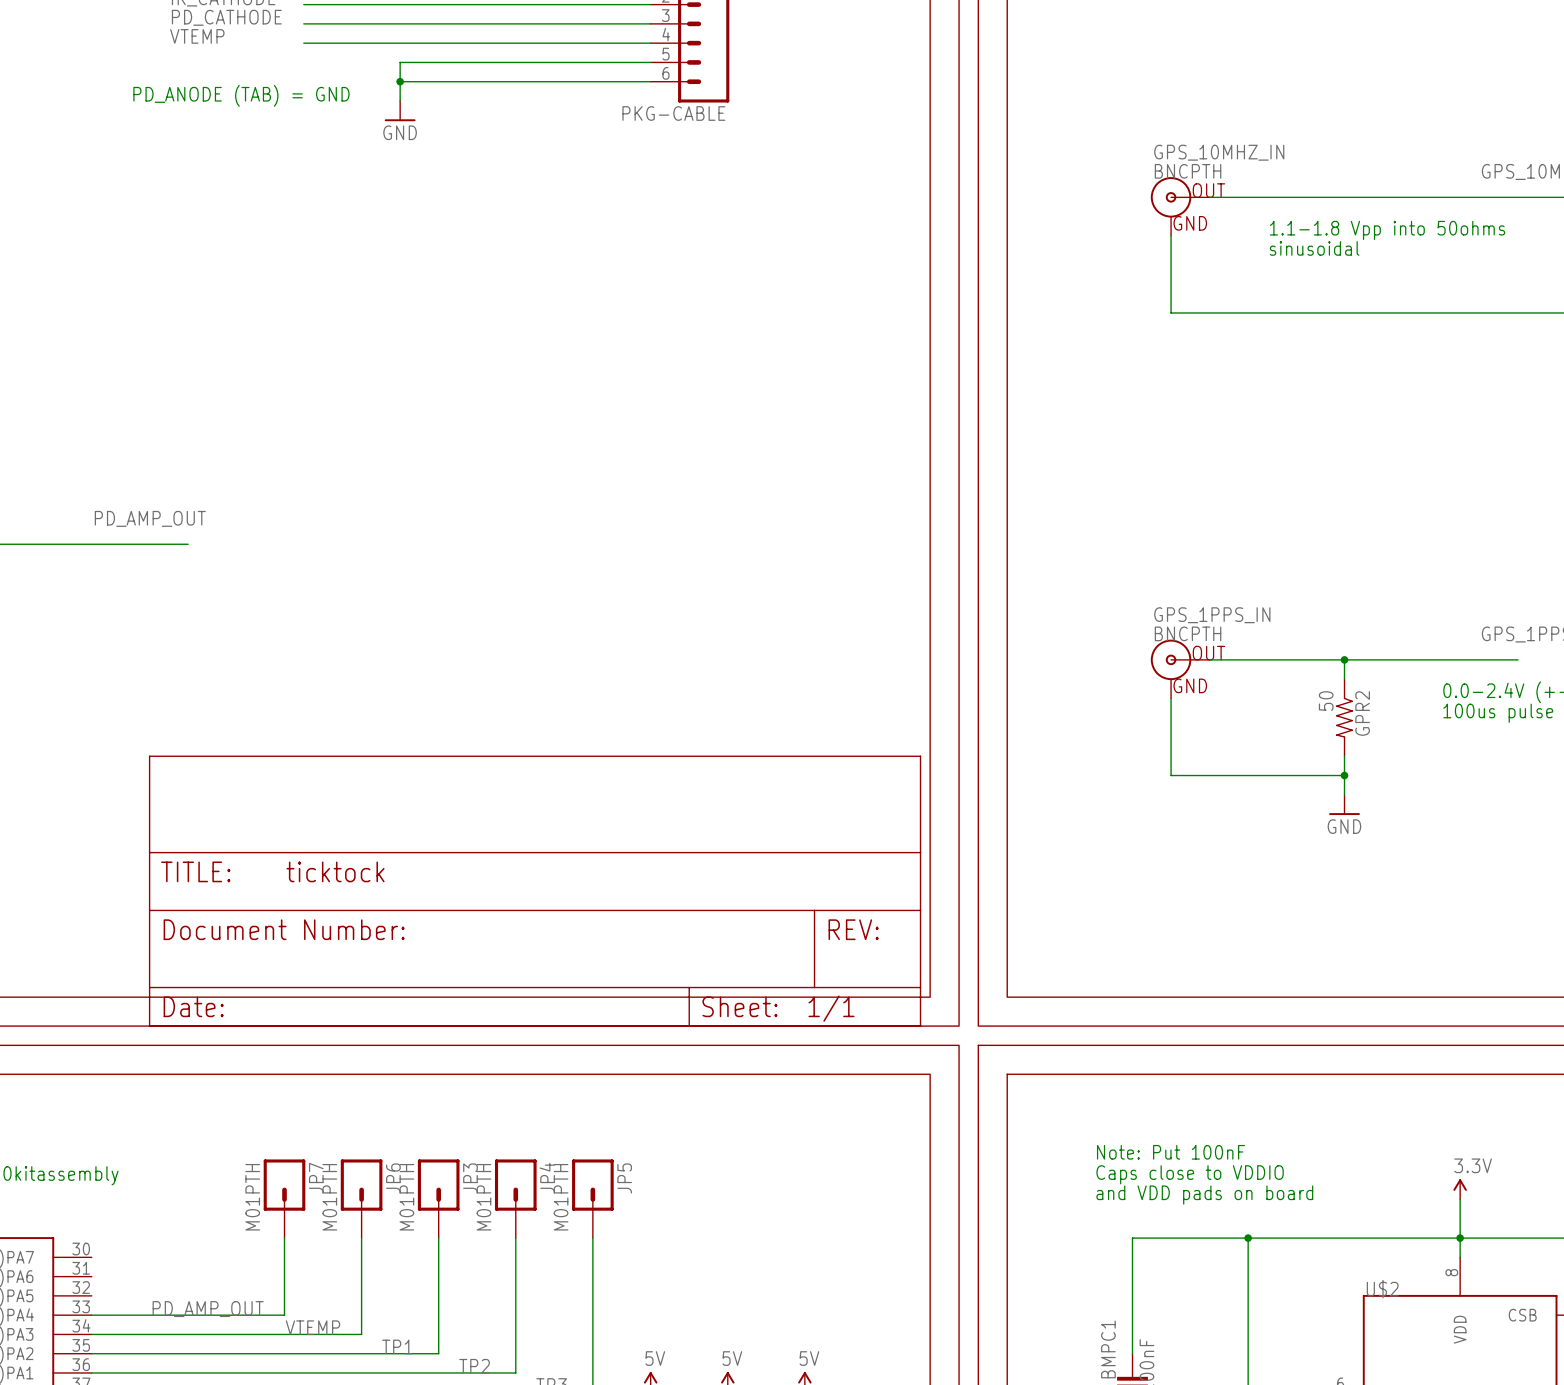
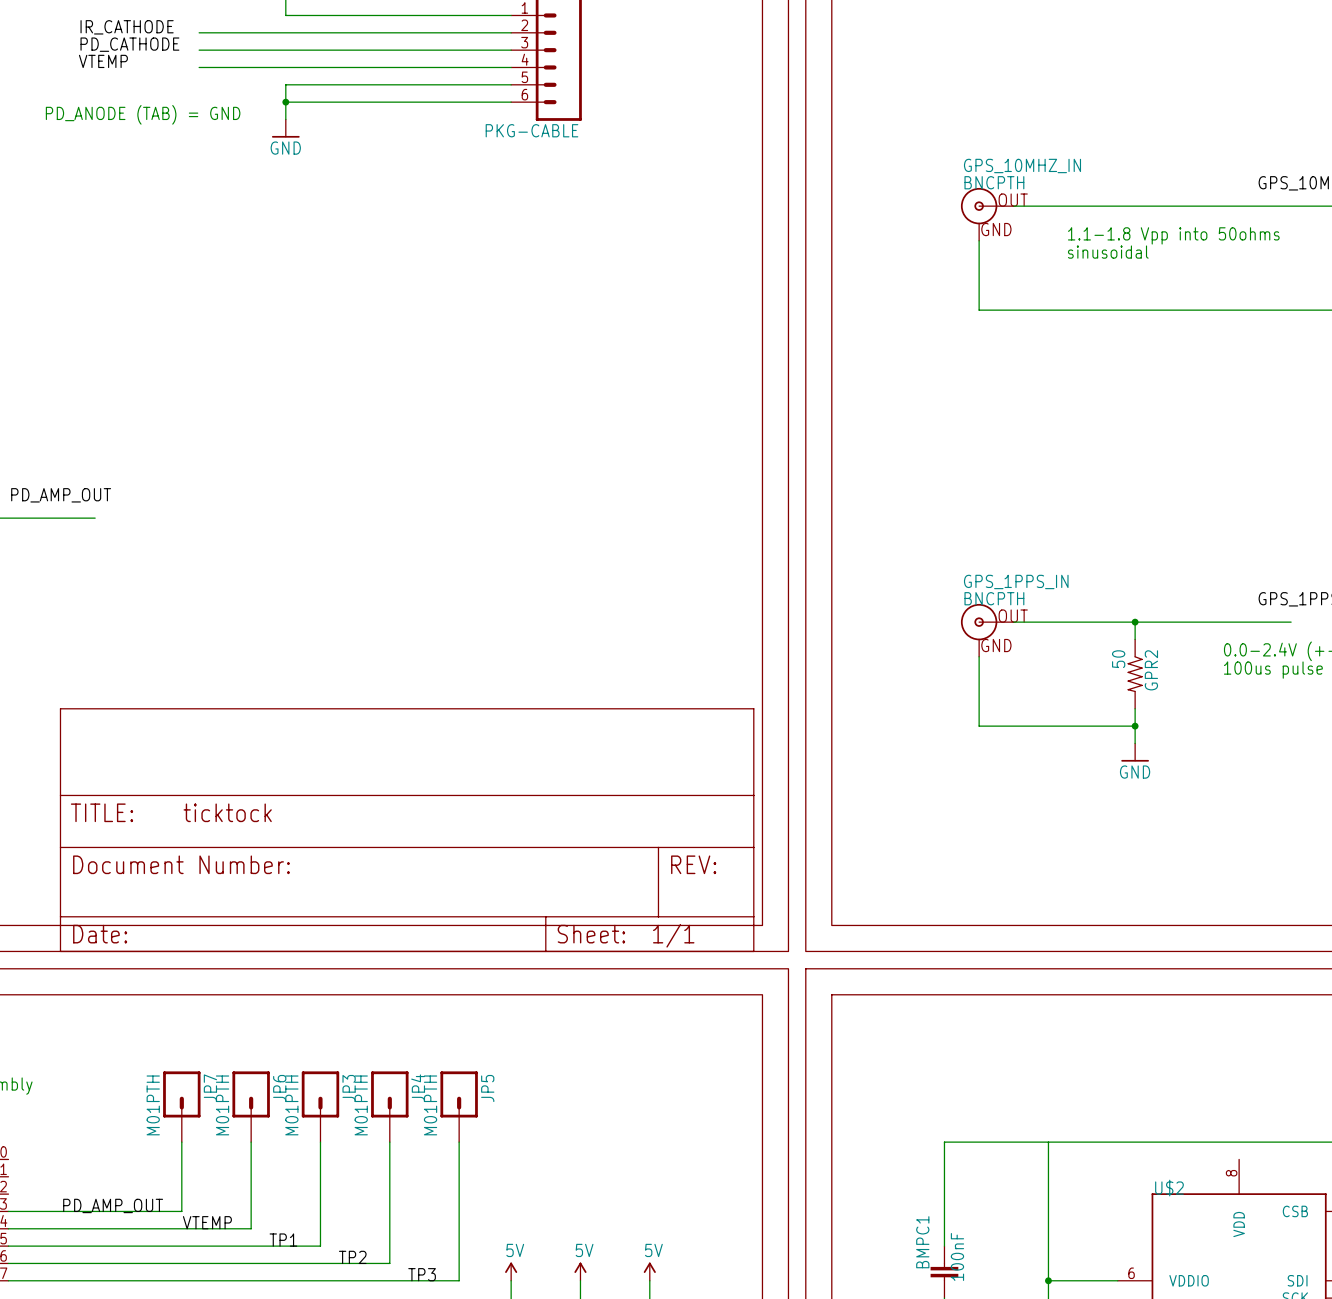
text: Note: Put 100nF (1170, 1152) -> none
text: Caps close to VDDIO (1190, 1174) -> none
power symbol: 3.3V (1460, 1189) -> none
text: and VDD pads on board (1204, 1195) -> none
wire: (1460, 1199) (1460, 1257) -> none
junction: (1248, 1238) -> none
junction: (1460, 1238) -> none

